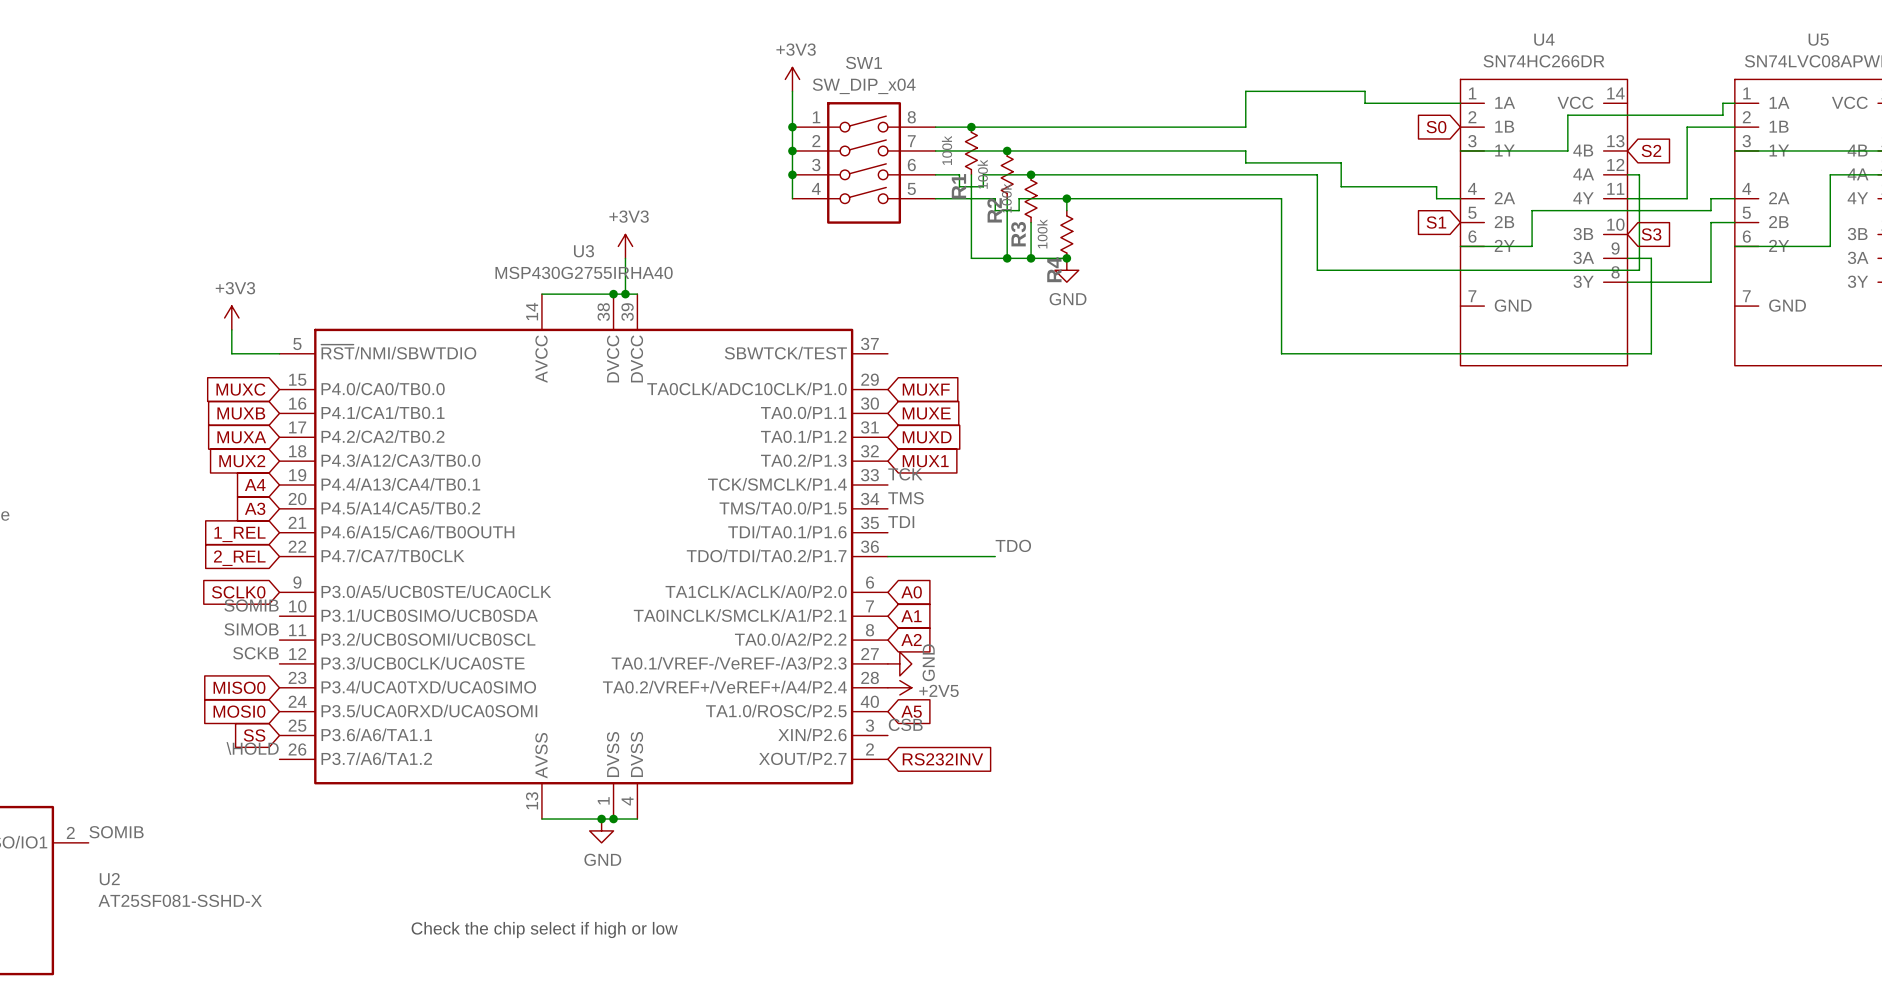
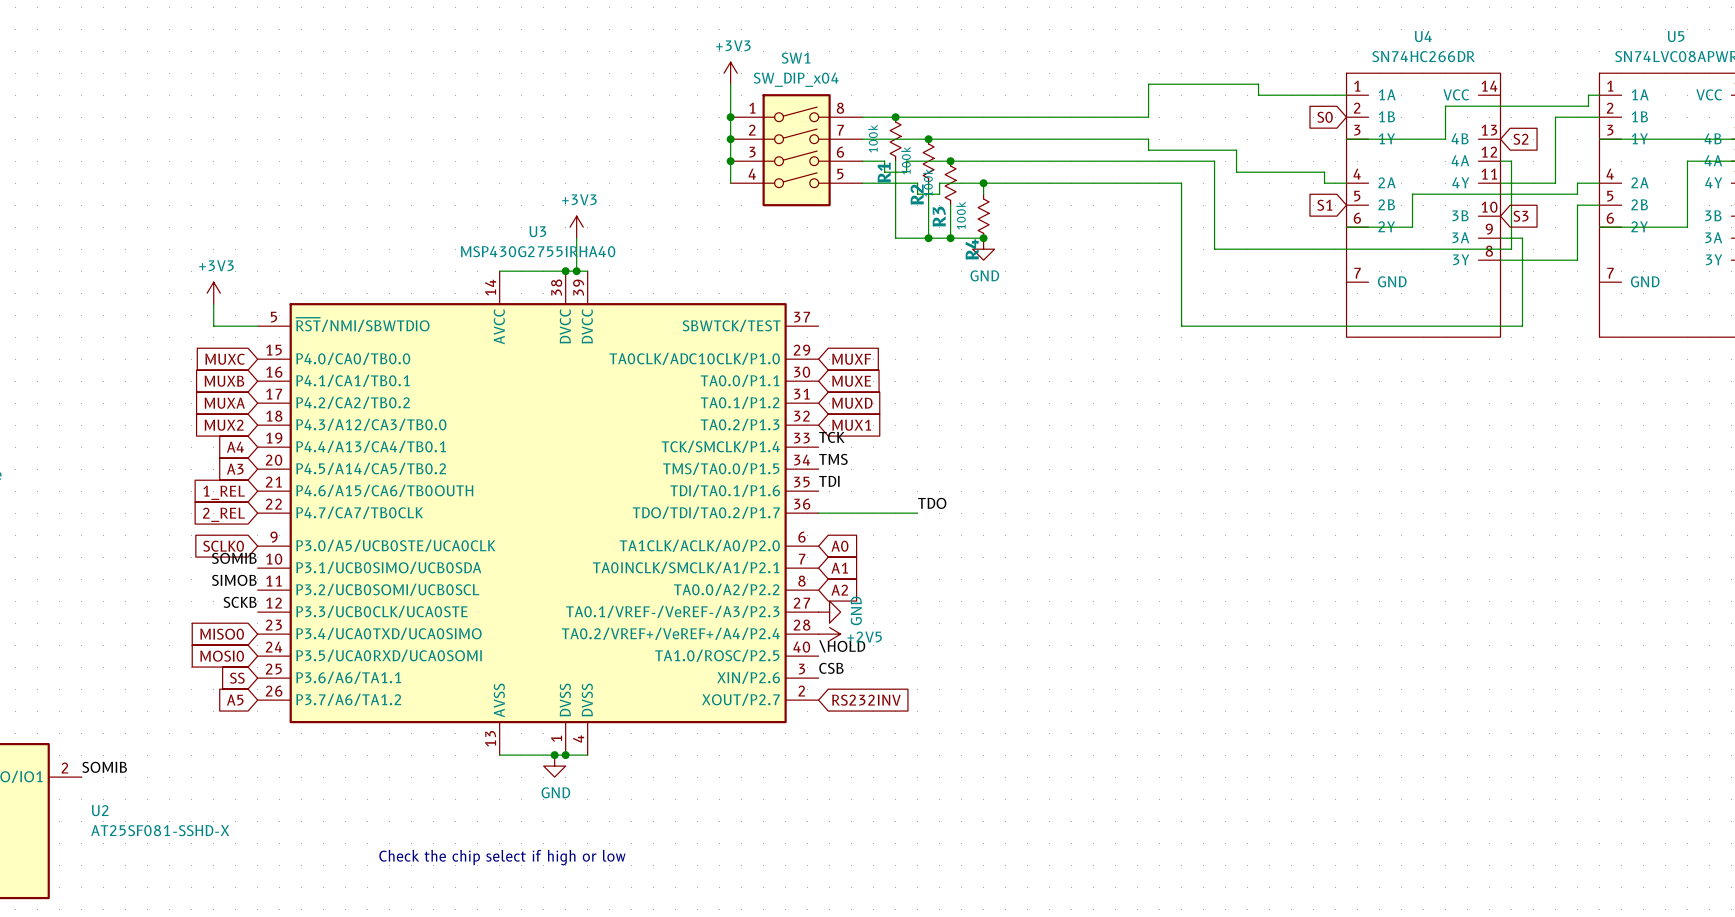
label: none -> \HOLD (842, 646)
global label: A5 (911, 711) -> none
label: \HOLD (252, 748) -> none
global label: none -> A5 (235, 700)

